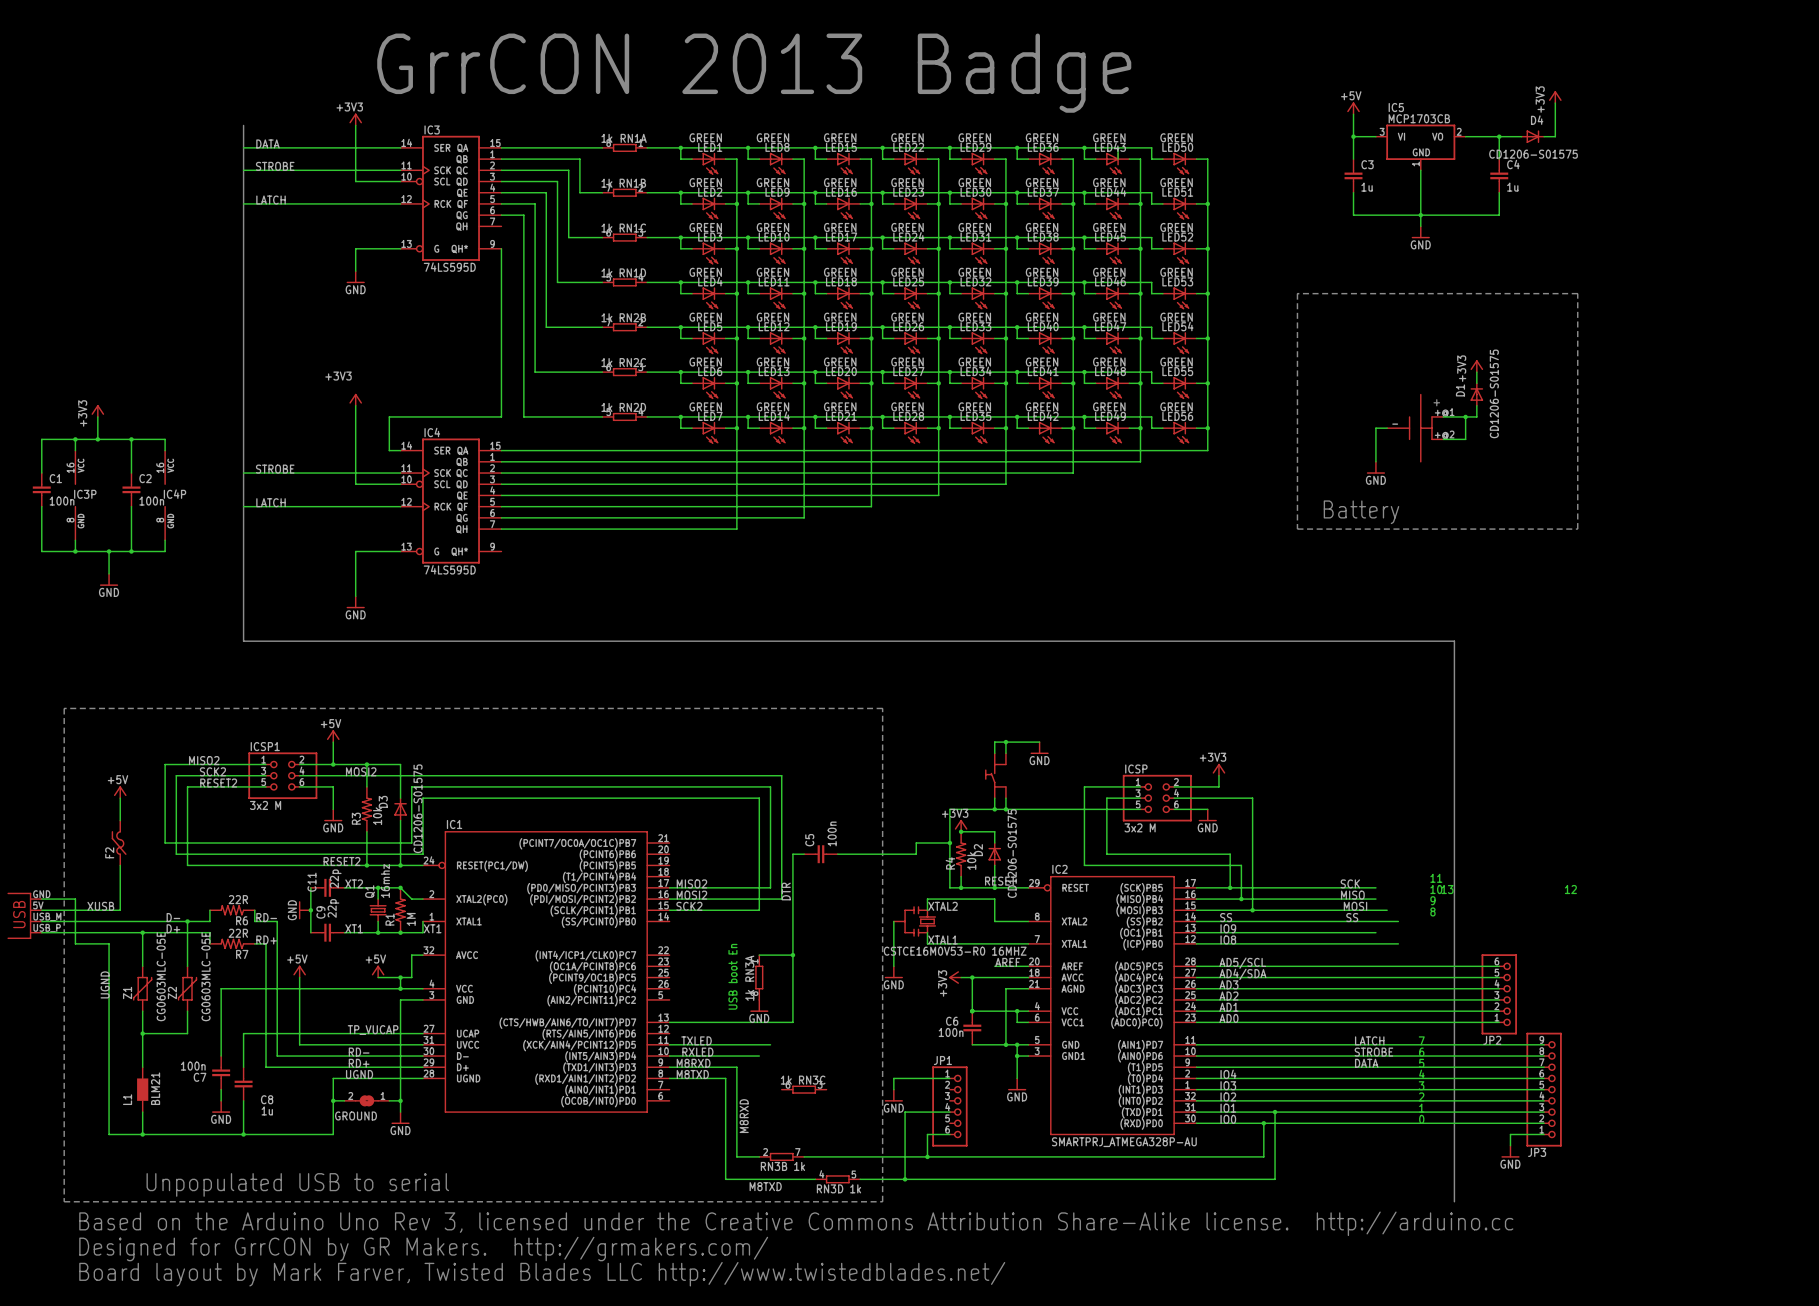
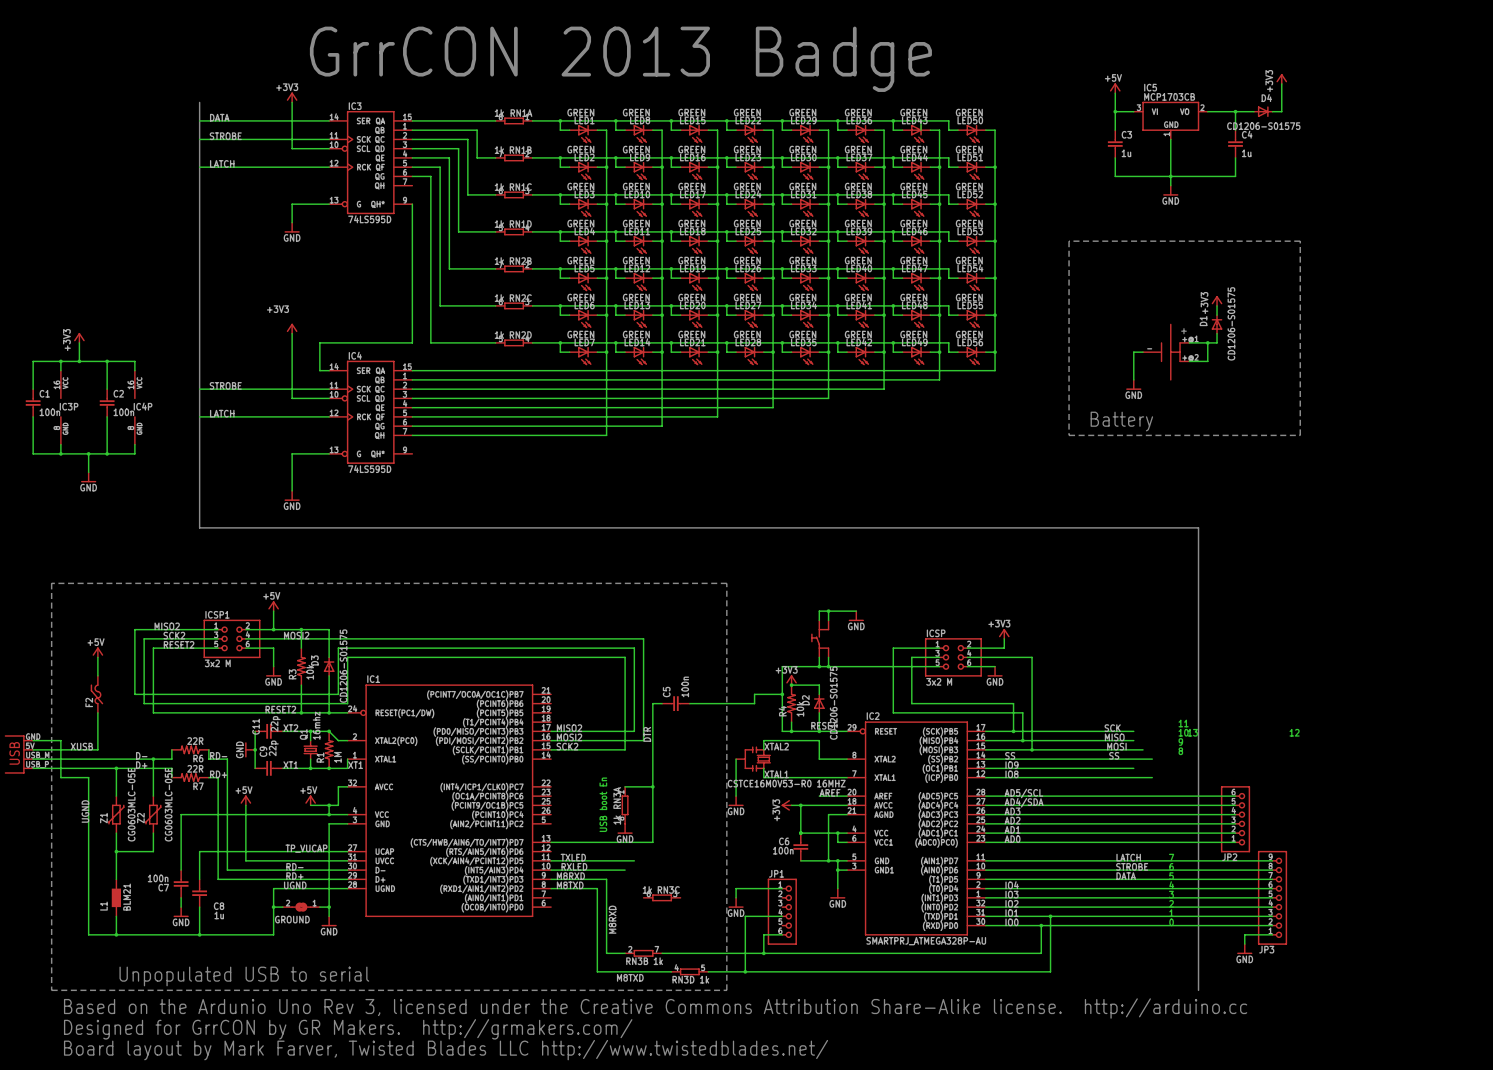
text: Based on the Arduino Uno Rev 3, licensed under the Creative Commons Attribution Share-Alike license. http://arduino.cc (796, 1223) -> Based on the Ardunio Uno Rev 3, licensed under the Creative Commons Attribution Share-Alike license. http://arduino.cc (655, 1008)

